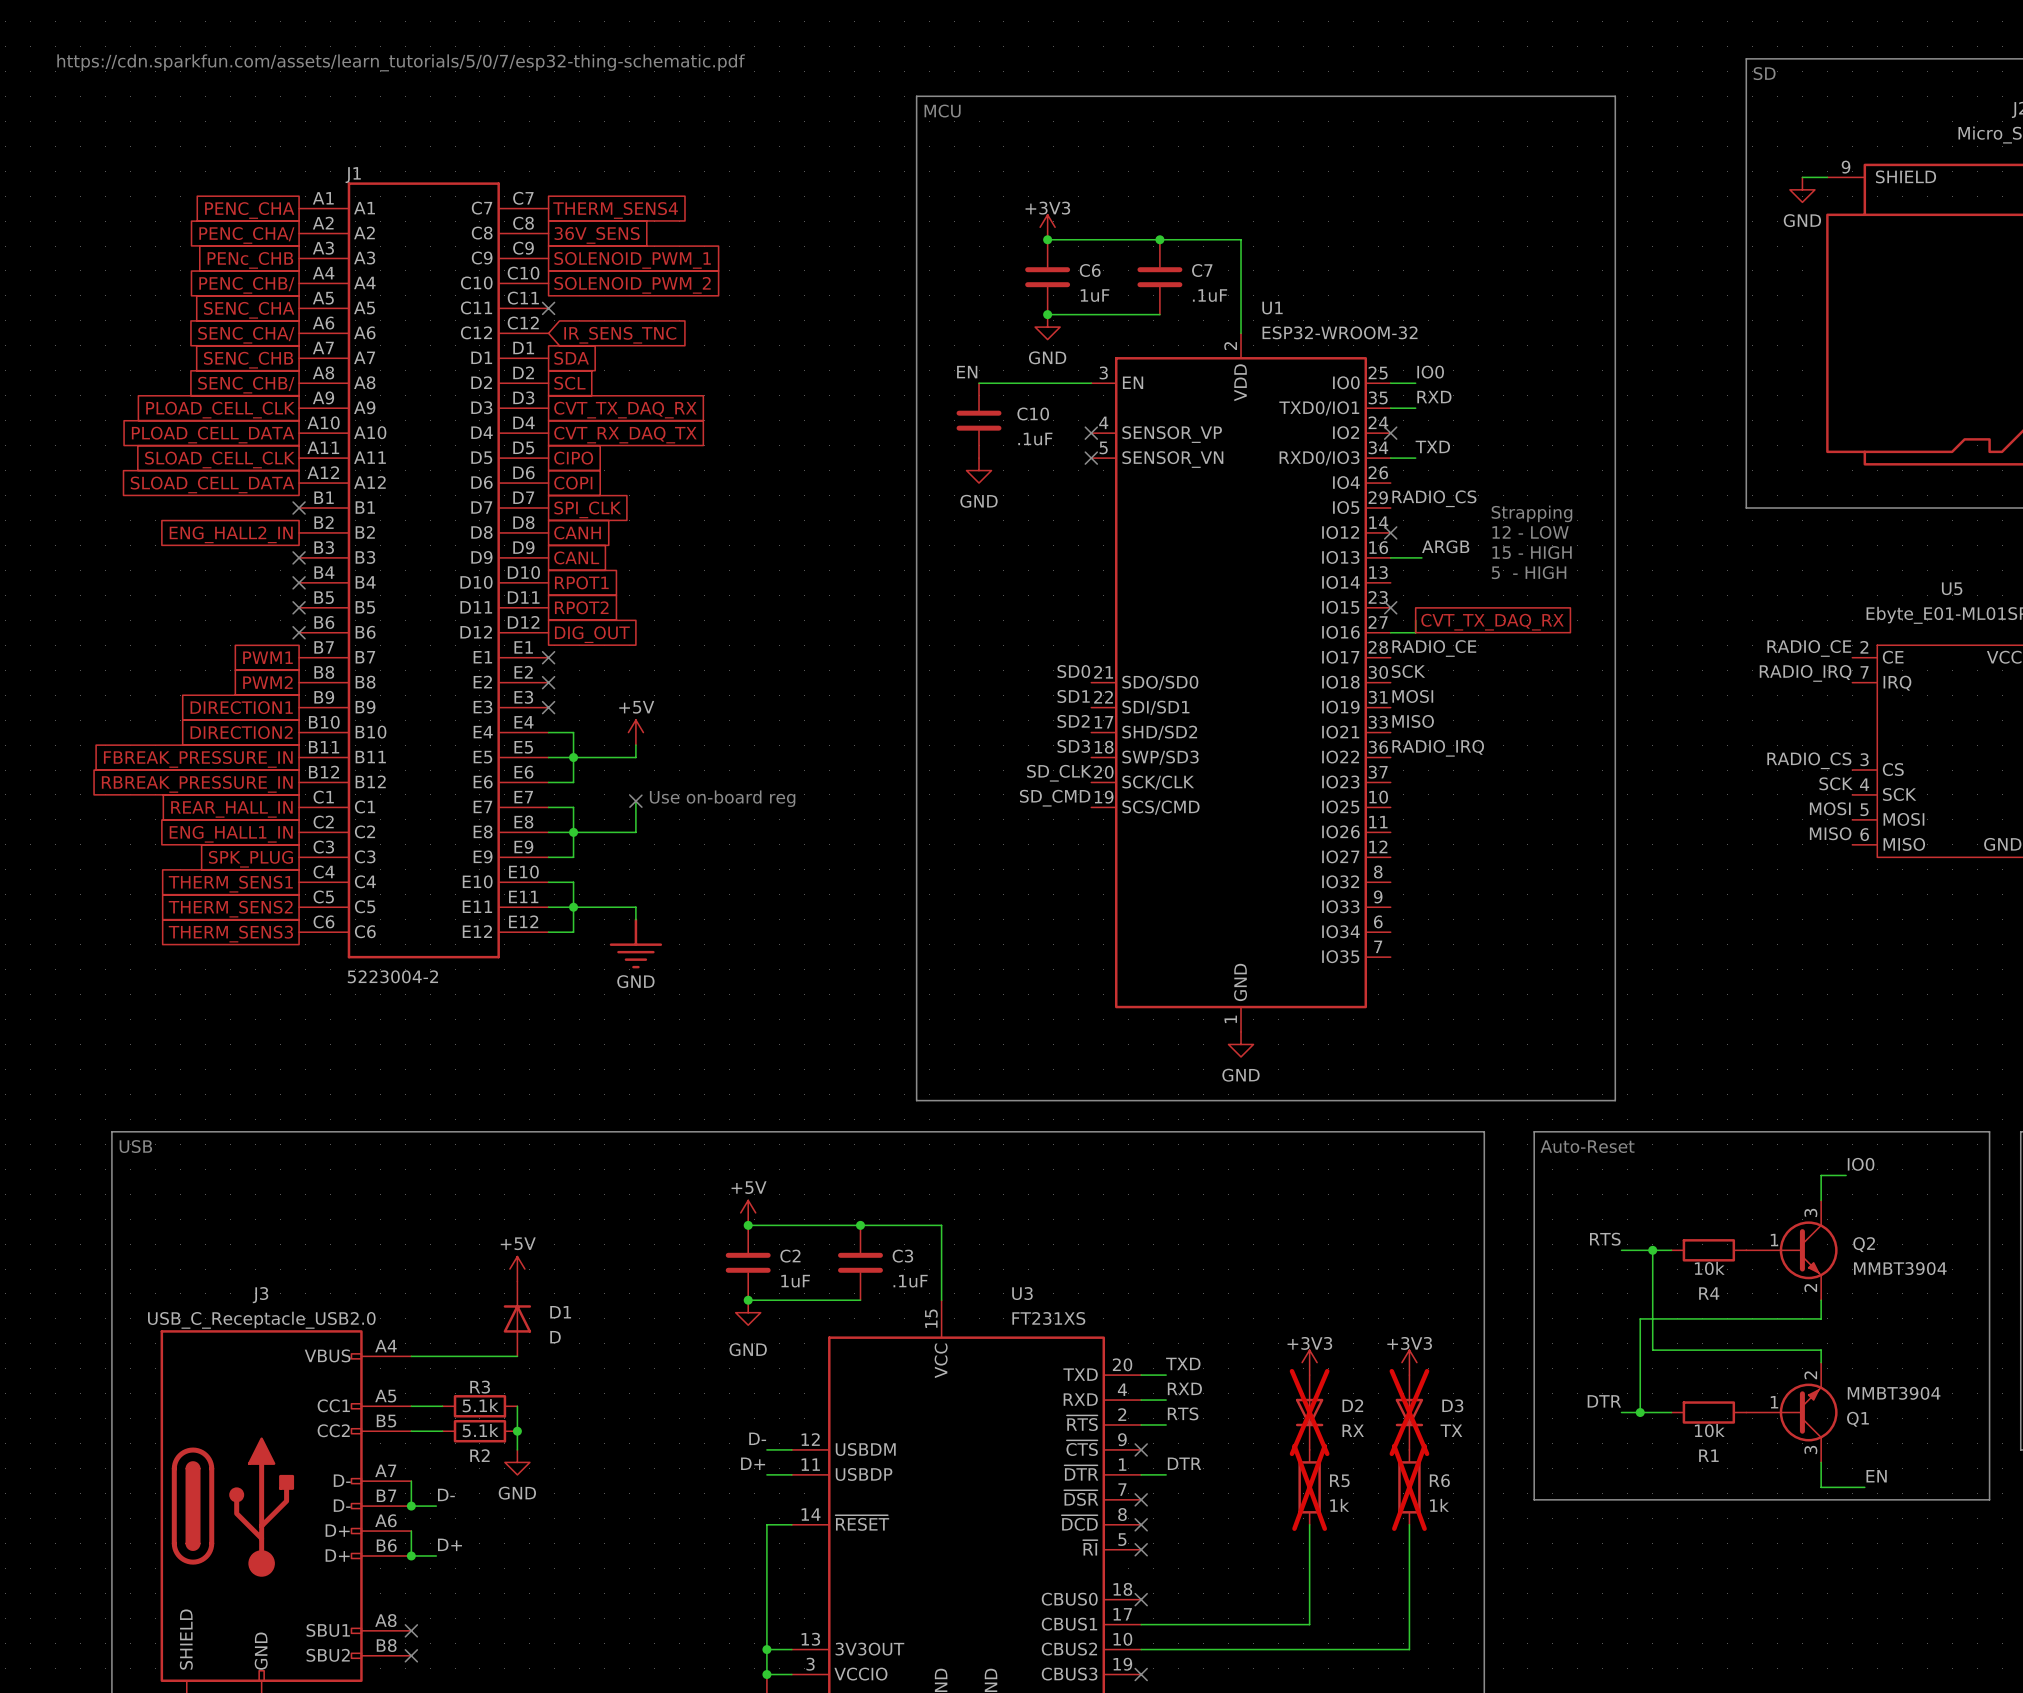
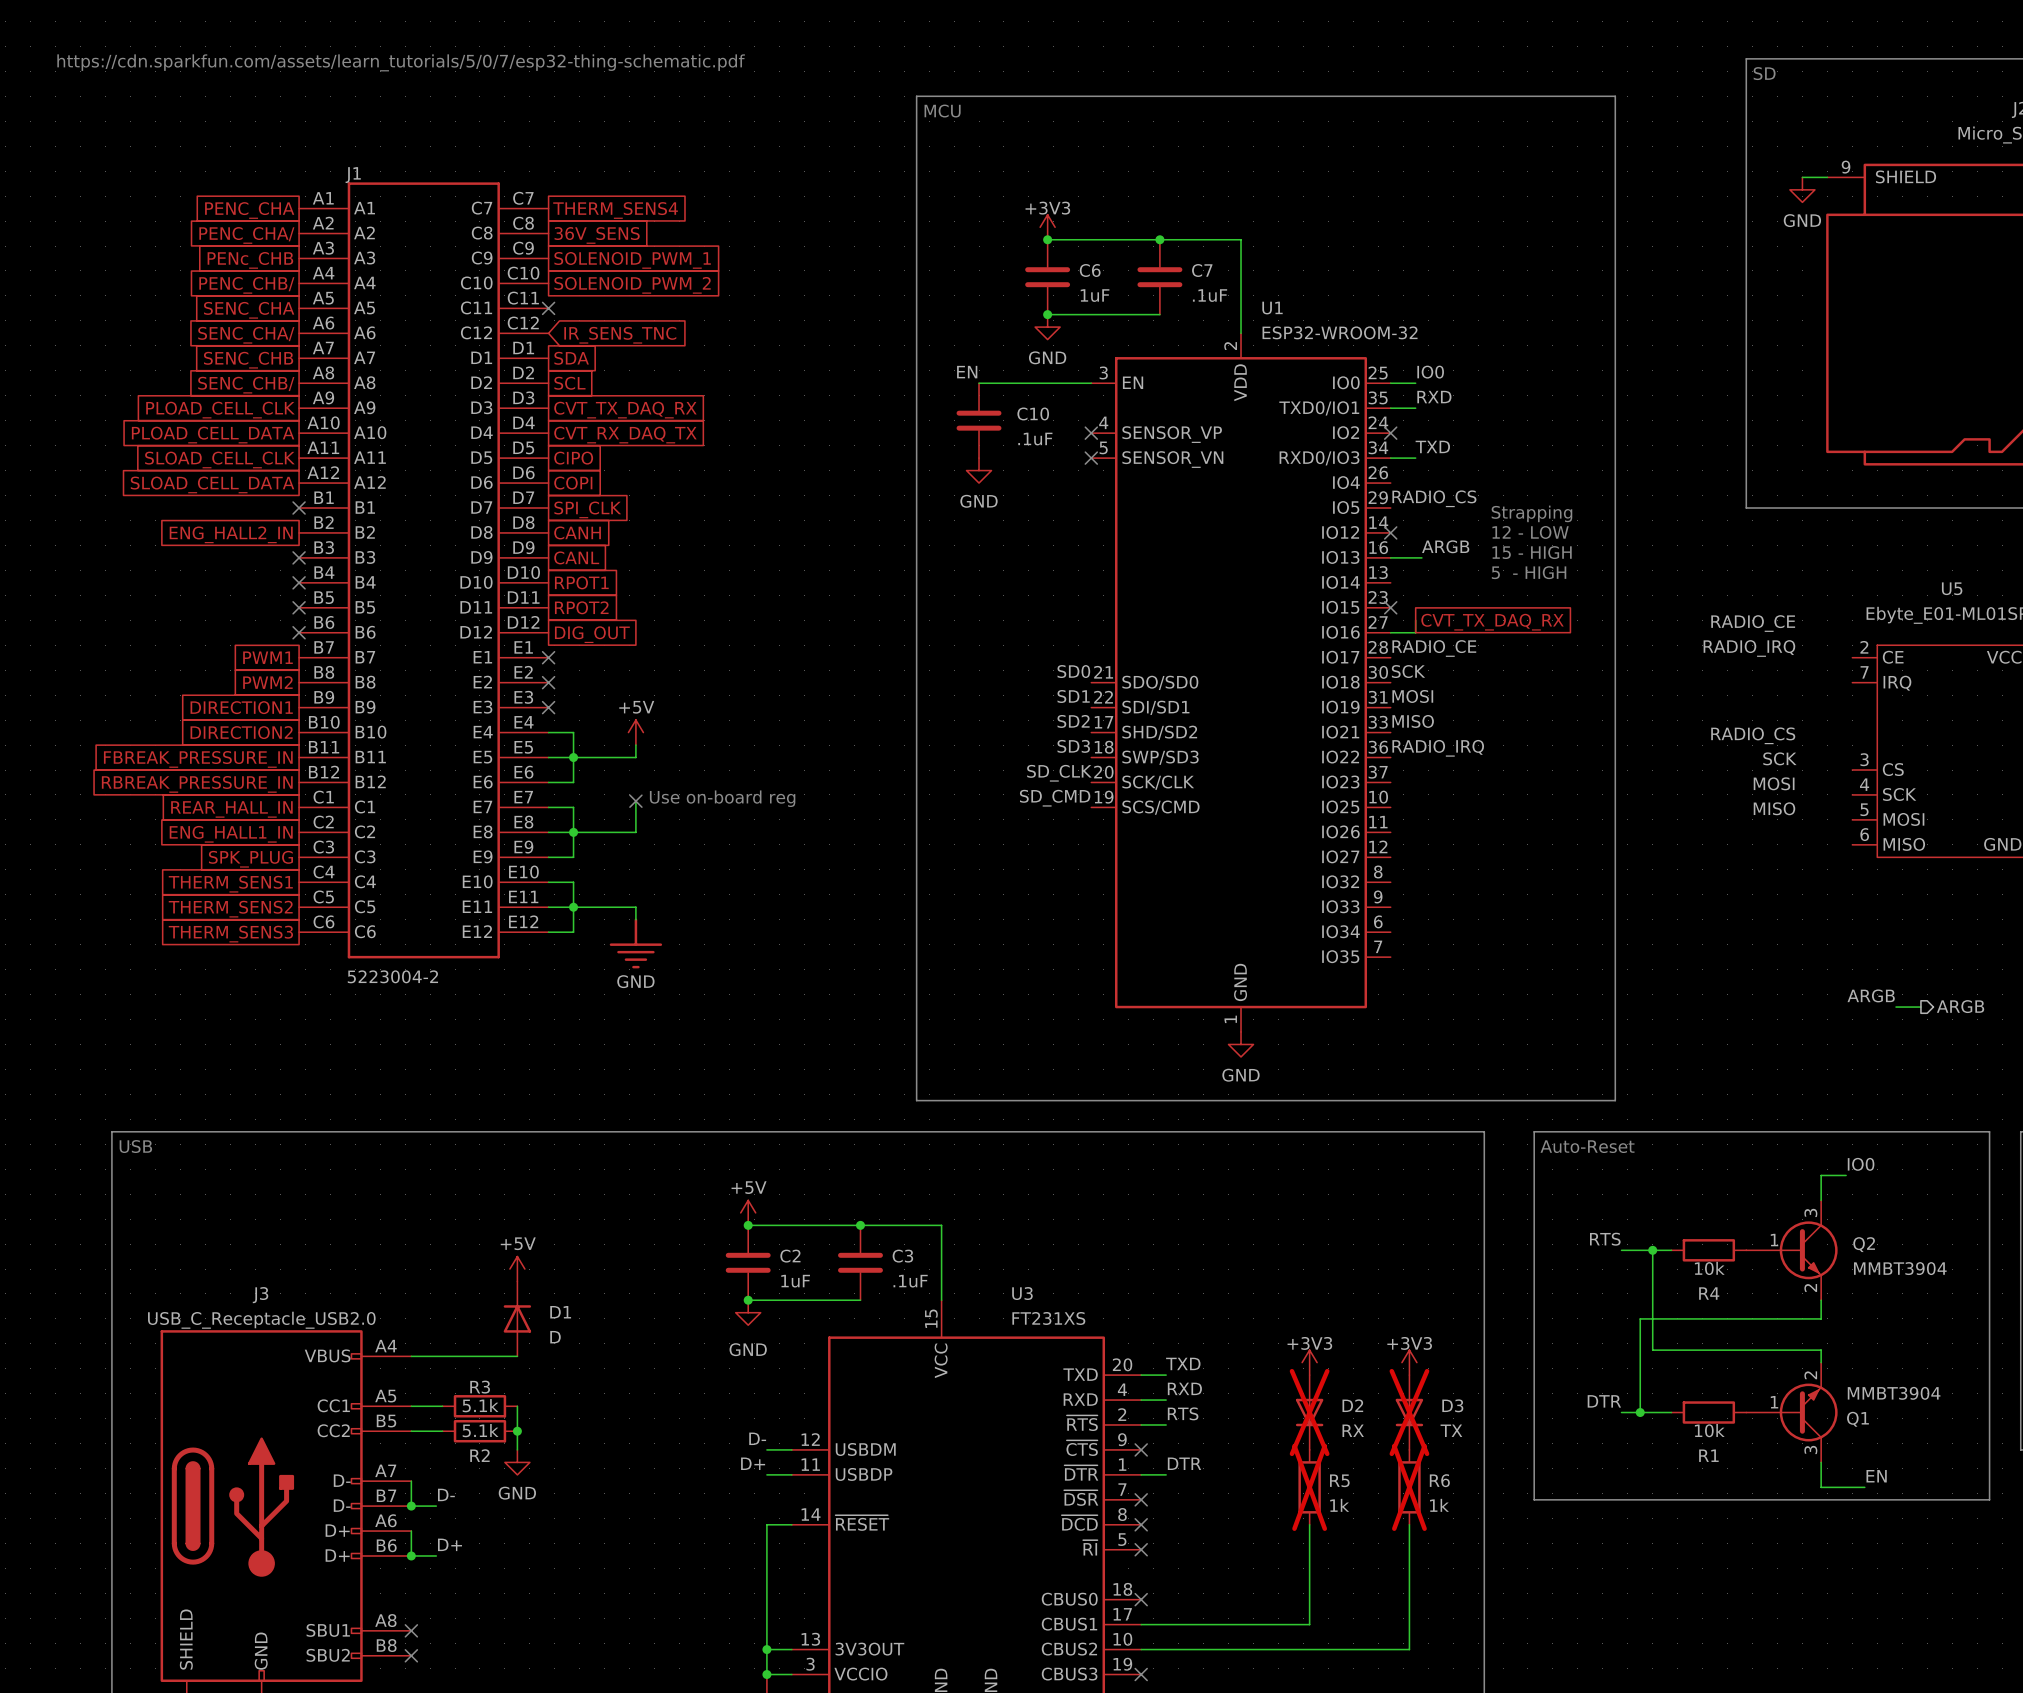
label position: RADIO_CE (1809, 648) -> RADIO_CE (1753, 623)
label position: RADIO_IRQ (1805, 673) -> RADIO_IRQ (1749, 648)
label position: RADIO_CS (1809, 760) -> RADIO_CS (1753, 735)
label position: SCK (1836, 783) -> SCK (1779, 758)
label position: MOSI (1830, 808) -> MOSI (1774, 783)
label position: MISO (1830, 833) -> MISO (1774, 808)
label: none -> ARGB (1871, 995)
sheet pin: none -> ARGB (1960, 1006)
wire: none -> (1896, 1007) (1920, 1007)

